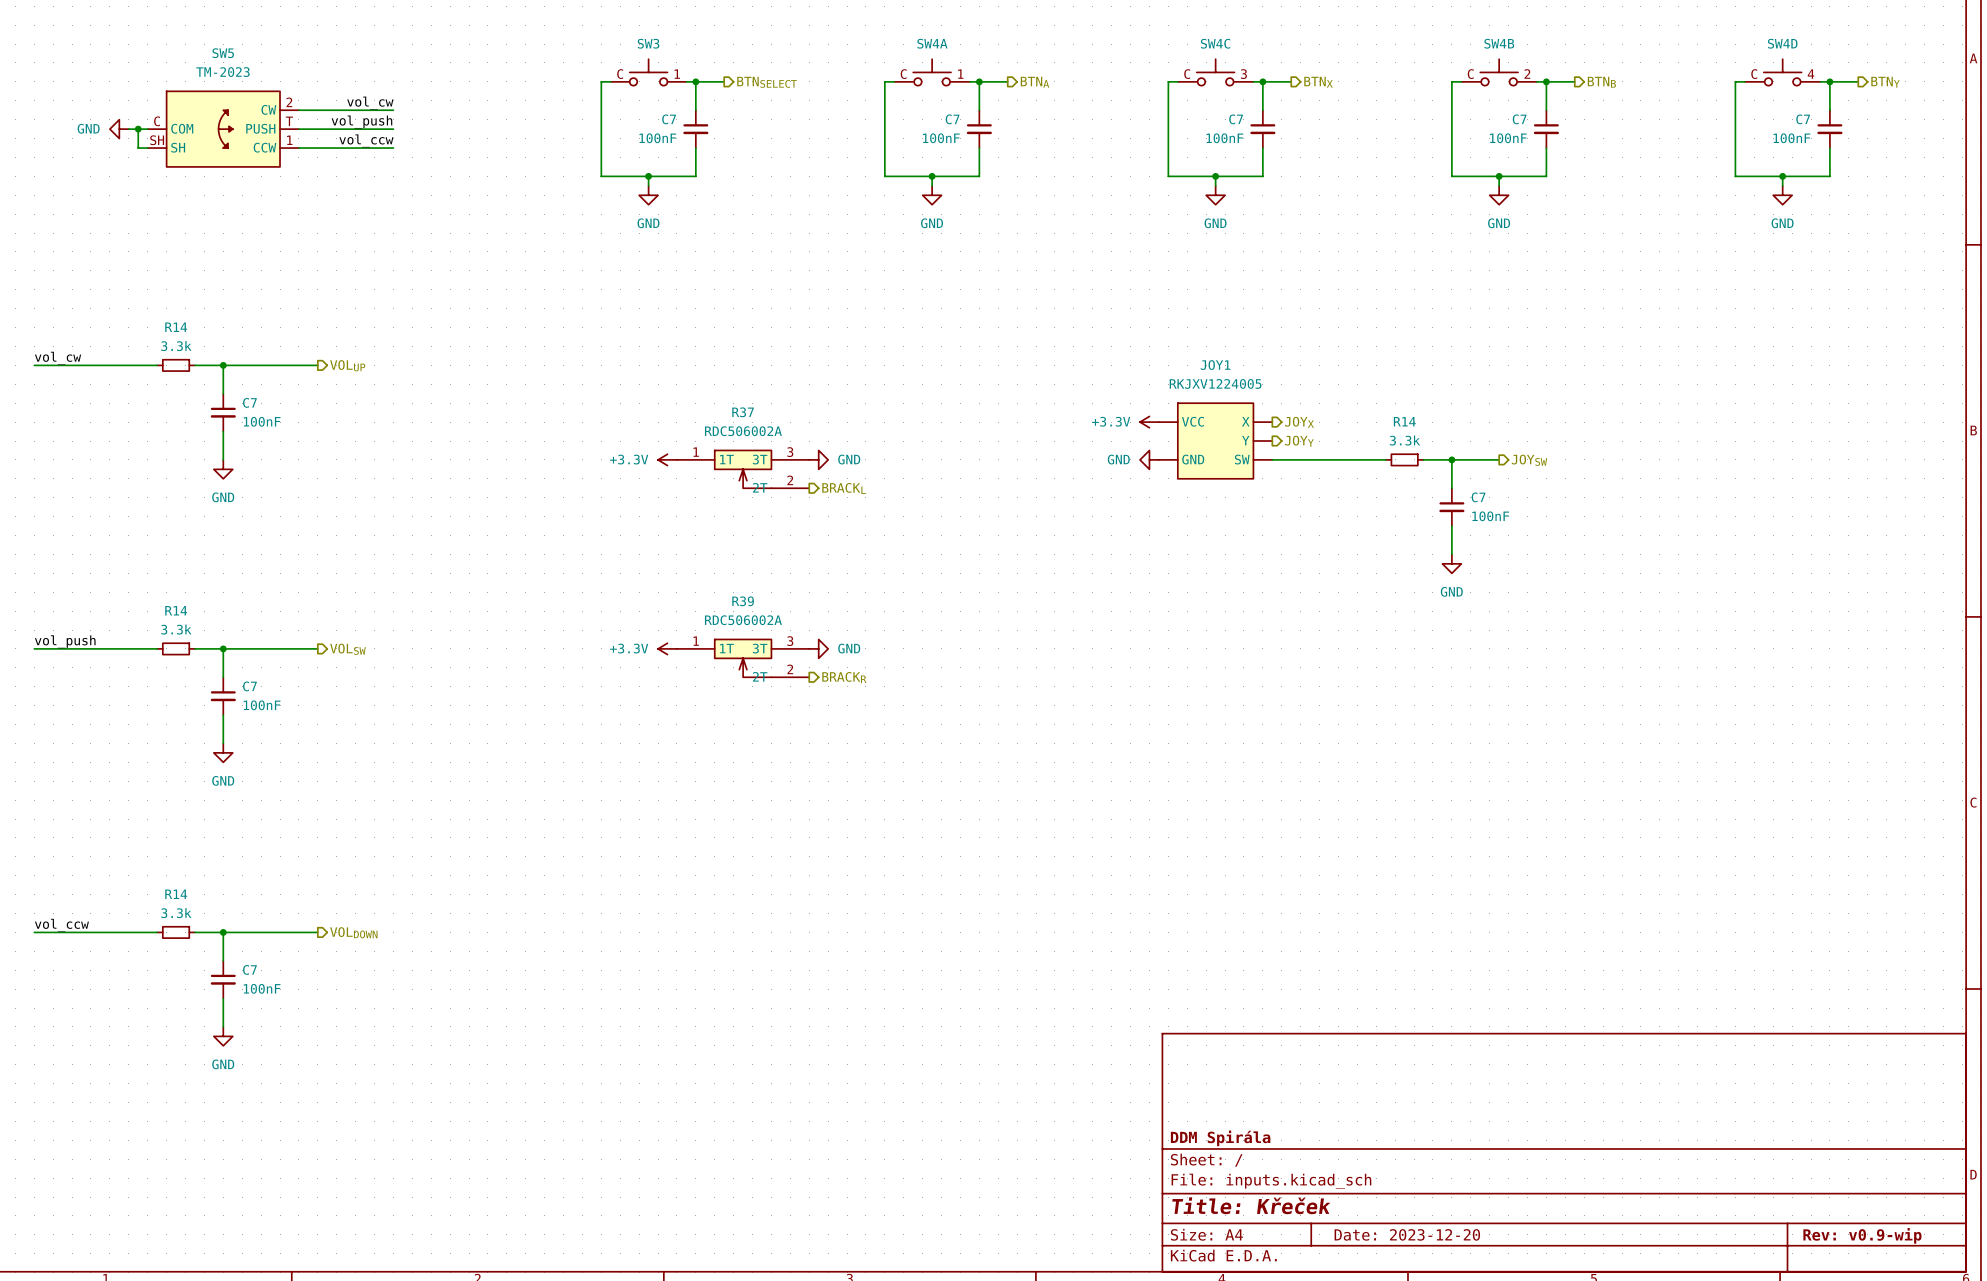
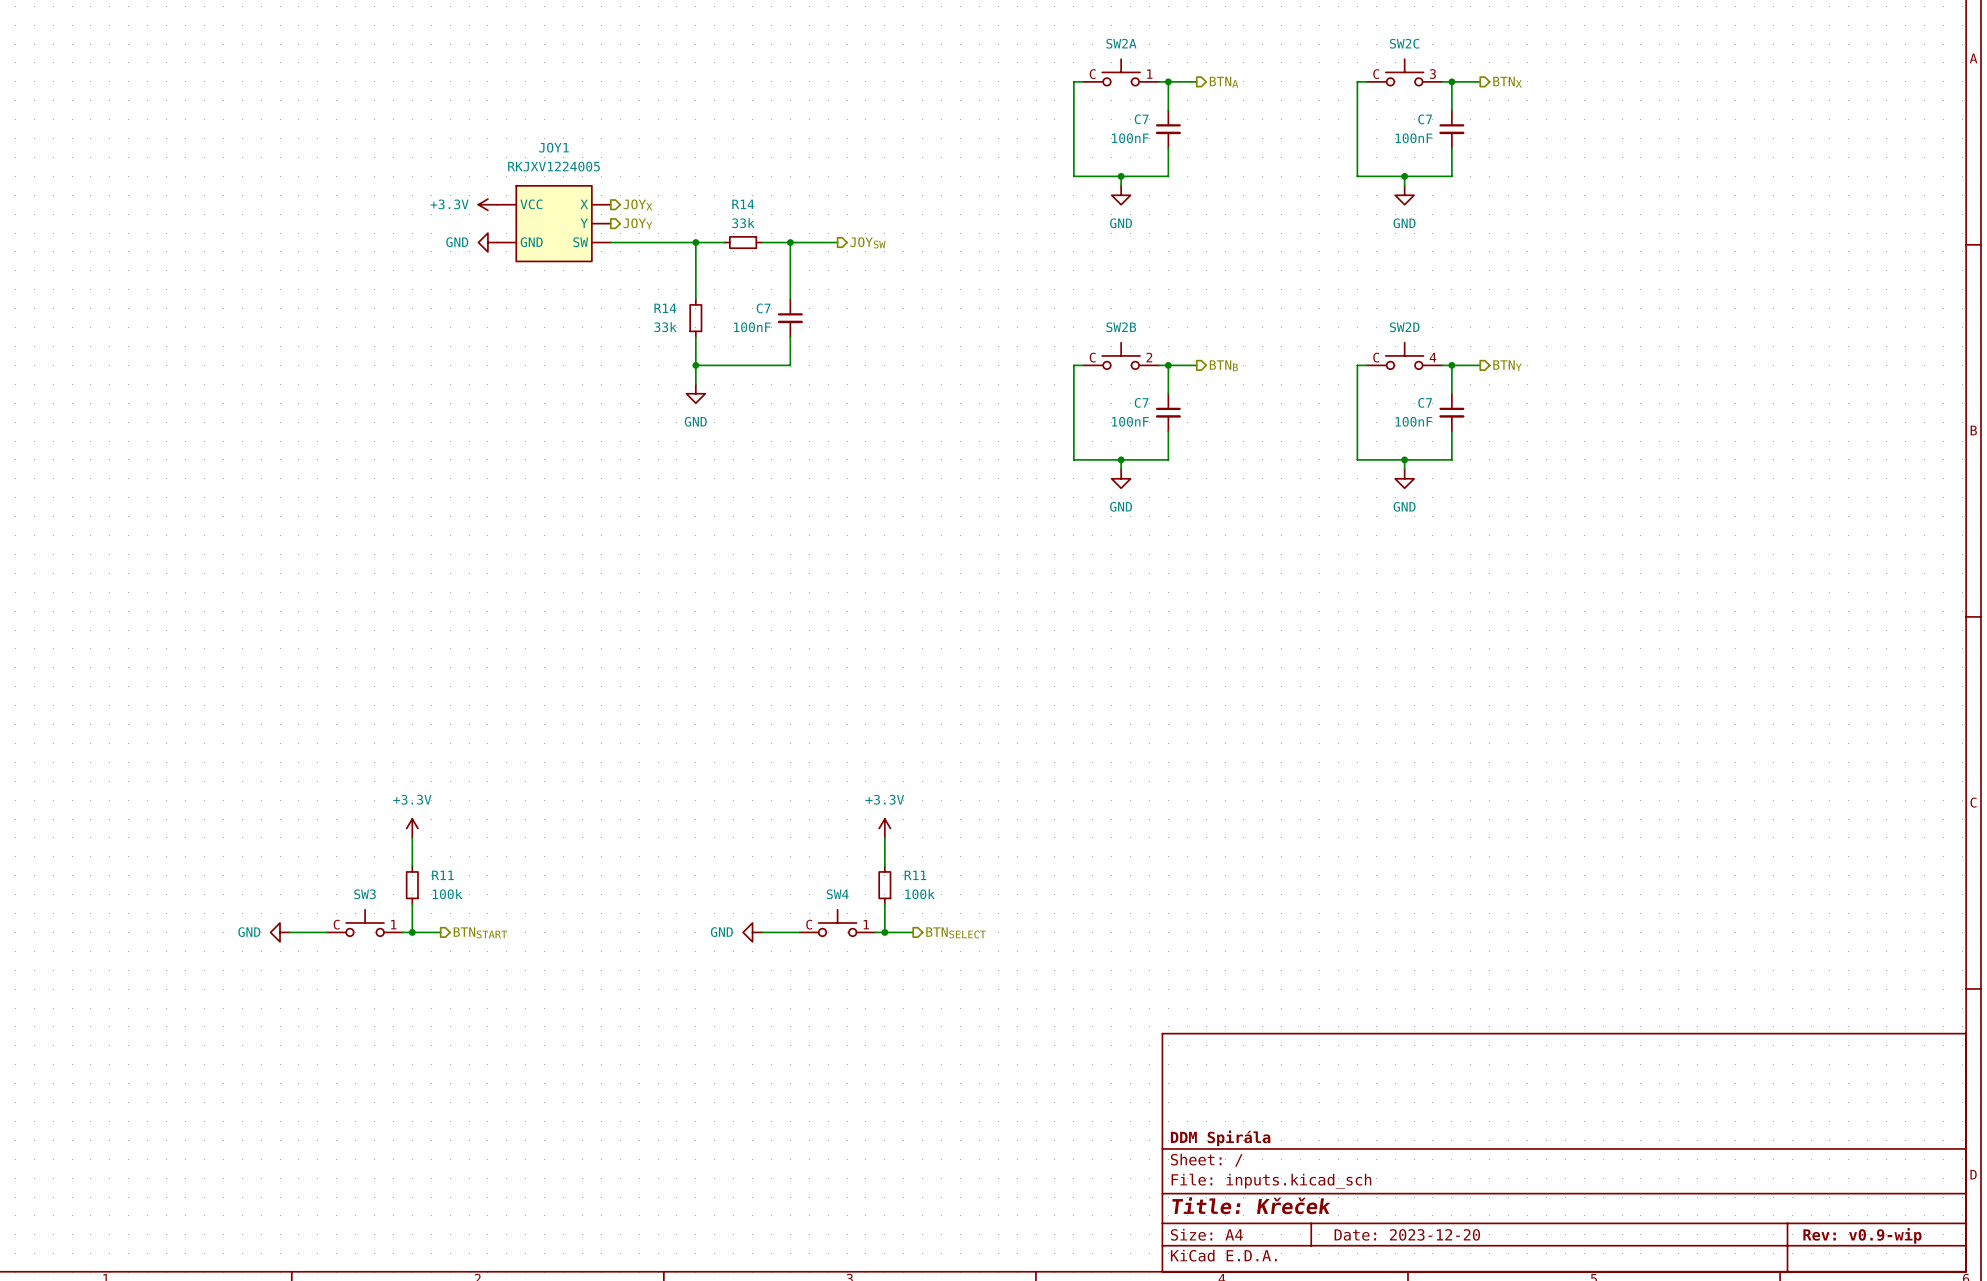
SW3 position: (648, 72) -> (365, 922)
SW4A: (932, 72) -> none
SW2A: none -> (1121, 72)
SW4C: (1215, 72) -> none
SW2C: none -> (1404, 72)
SW4B: (1499, 72) -> none
SW4D: (1782, 72) -> none
wire: (610, 81) (601, 81) (601, 176) (695, 176) (695, 148) -> none
wire: (686, 81) (724, 81) -> none
wire: (695, 81) (695, 110) -> none
junction: (695, 81) -> none
wire: (894, 81) (884, 81) (884, 176) (979, 176) (979, 148) -> none
wire: (969, 81) (1007, 81) -> none
wire: (979, 81) (979, 110) -> none
junction: (979, 81) -> none
wire: none -> (1158, 81) (1168, 81)
junction: none -> (1168, 81)
wire: (1253, 81) (1291, 81) -> none
wire: (1262, 81) (1262, 110) -> none
junction: (1262, 81) -> none
wire: none -> (1442, 81) (1451, 81)
junction: none -> (1451, 81)
wire: (1536, 81) (1574, 81) -> none
wire: (1546, 81) (1546, 110) -> none
junction: (1546, 81) -> none
wire: (1744, 81) (1735, 81) (1735, 176) (1829, 176) (1829, 148) -> none
wire: (1820, 81) (1858, 81) -> none
wire: (1829, 81) (1829, 110) -> none
junction: (1829, 81) -> none
hierarchical label: BTNSELECT (767, 82) -> none
hierarchical label: BTNA (1034, 82) -> none
hierarchical label: none -> BTNA (1223, 82)
hierarchical label: BTNX (1318, 82) -> none
hierarchical label: none -> BTNX (1507, 82)
hierarchical label: BTNB (1601, 82) -> none
hierarchical label: BTNY (1885, 82) -> none
label: vol_cw (370, 103) -> none
wire: (298, 110) (393, 110) -> none
label: vol_push (361, 121) -> none
power symbol: GND (119, 129) -> none
wire: (128, 129) (147, 129) -> none
wire: (138, 129) (138, 148) (147, 148) -> none
junction: (138, 129) -> none
SW5: TM-2023 (223, 129) -> none
wire: (298, 129) (393, 129) -> none
C7: 100nF (695, 129) -> none
C7: 100nF (979, 129) -> none
C7: none -> 100nF (1168, 129)
C7: 100nF (1262, 129) -> none
C7: none -> 100nF (1451, 129)
C7: 100nF (1546, 129) -> none
C7: 100nF (1829, 129) -> none
label: vol_ccw (366, 140) -> none
wire: (298, 148) (393, 148) -> none
wire: (1262, 148) (1262, 176) (1168, 176) -> (1083, 81) (1073, 81) (1073, 176) (1168, 176)
wire: (1546, 148) (1546, 176) (1451, 176) -> (1366, 81) (1357, 81) (1357, 176) (1451, 176)
wire: (648, 176) (648, 185) -> none
junction: (648, 176) -> none
wire: (932, 176) (932, 185) -> none
junction: (932, 176) -> none
junction: none -> (1121, 176)
wire: (1215, 176) (1215, 185) -> (1121, 176) (1121, 185)
junction: (1215, 176) -> none
junction: none -> (1404, 176)
wire: (1499, 176) (1499, 185) -> (1404, 176) (1404, 185)
junction: (1499, 176) -> none
wire: (1782, 176) (1782, 185) -> none
junction: (1782, 176) -> none
power symbol: GND (648, 195) -> none
power symbol: GND (932, 195) -> none
power symbol: none -> GND (1121, 195)
power symbol: GND (1215, 195) -> none
power symbol: none -> GND (1404, 195)
power symbol: GND (1499, 195) -> none
power symbol: GND (1782, 195) -> none
power symbol: none -> +3.3V (487, 204)
hierarchical label: none -> JOYX (637, 205)
hierarchical label: none -> JOYY (637, 223)
power symbol: none -> GND (487, 242)
wire: none -> (610, 242) (724, 242)
wire: none -> (695, 242) (695, 299)
junction: none -> (695, 242)
R14: none -> 33k (743, 242)
wire: none -> (761, 242) (837, 242)
wire: none -> (790, 242) (790, 299)
junction: none -> (790, 242)
hierarchical label: none -> JOYSW (867, 242)
R14: none -> 33k (695, 318)
C7: none -> 100nF (790, 318)
wire: none -> (695, 337) (695, 384)
wire: none -> (790, 337) (790, 365) (695, 365)
SW2B: none -> (1121, 355)
SW2D: none -> (1404, 355)
label: vol_cw (58, 358) -> none
wire: (34, 365) (157, 365) -> none
R14: 3.3k (176, 365) -> none
wire: (194, 365) (317, 365) -> none
wire: (223, 365) (223, 393) -> none
junction: (223, 365) -> none
hierarchical label: VOLUP (347, 365) -> none
junction: none -> (695, 365)
wire: none -> (1083, 365) (1073, 365) (1073, 459) (1168, 459) (1168, 431)
wire: none -> (1158, 365) (1196, 365)
wire: none -> (1168, 365) (1168, 393)
junction: none -> (1168, 365)
hierarchical label: none -> BTNB (1223, 365)
wire: none -> (1442, 365) (1480, 365)
wire: none -> (1451, 365) (1451, 393)
junction: none -> (1451, 365)
hierarchical label: none -> BTNY (1507, 365)
power symbol: none -> GND (695, 393)
C7: 100nF (223, 412) -> none
C7: none -> 100nF (1168, 412)
power symbol: +3.3V (1149, 422) -> none
hierarchical label: JOYX (1299, 422) -> none
wire: (223, 431) (223, 459) -> none
JOY1 position: (1215, 441) -> (554, 223)
hierarchical label: JOYY (1299, 441) -> none
power symbol: +3.3V (667, 459) -> none
power symbol: GND (818, 459) -> none
wire: none -> (1121, 459) (1121, 469)
junction: none -> (1121, 459)
power symbol rotation: 0° (1149, 459) -> 90° counterclockwise (1121, 478)
power symbol position: GND (1149, 459) -> GND (1121, 478)
wire: (1272, 459) (1357, 459) -> (1366, 365) (1357, 365) (1357, 459)
wire: none -> (1385, 459) (1423, 459)
wire: none -> (1404, 459) (1404, 469)
junction: none -> (1404, 459)
R14: 3.3k (1404, 459) -> none
junction: (1451, 459) -> none
wire: (1499, 459) (1451, 459) (1451, 488) -> none
hierarchical label: JOYSW (1529, 460) -> none
power symbol: GND (223, 469) -> none
R37: RDC506002A (743, 469) -> none
hierarchical label: BRACKL (844, 488) -> none
C7 name position: C7 (1478, 497) -> C7 (1425, 402)
C7 position: (1451, 507) -> (1451, 412)
C7 value position: 100nF (1490, 516) -> 100nF (1413, 421)
wire: (1451, 526) (1451, 554) -> (1451, 431) (1451, 459)
power symbol position: GND (1451, 563) -> GND (1404, 478)
label: vol_push (65, 641) -> none
wire: (34, 648) (157, 648) -> none
R14: 3.3k (176, 648) -> none
wire: (194, 648) (317, 648) -> none
wire: (223, 648) (223, 677) -> none
junction: (223, 648) -> none
power symbol: +3.3V (667, 648) -> none
power symbol: GND (818, 648) -> none
hierarchical label: VOLSW (347, 649) -> none
R39: RDC506002A (743, 658) -> none
hierarchical label: BRACKR (844, 677) -> none
C7: 100nF (223, 696) -> none
wire: (223, 715) (223, 743) -> none
power symbol: GND (223, 752) -> none
power symbol: none -> +3.3V (412, 828)
power symbol: none -> +3.3V (884, 828)
wire: none -> (412, 837) (412, 866)
wire: none -> (884, 837) (884, 866)
R11: none -> 100k (412, 885)
R11: none -> 100k (884, 885)
wire: none -> (412, 904) (412, 932)
wire: none -> (884, 904) (884, 932)
SW4: none -> (837, 922)
label: vol_ccw (61, 925) -> none
wire: (34, 932) (157, 932) -> none
R14: 3.3k (176, 932) -> none
wire: (194, 932) (289, 932) -> none
wire: (223, 932) (223, 960) -> none
junction: (223, 932) -> none
power symbol: none -> GND (280, 932)
wire: none -> (317, 932) (327, 932)
hierarchical label: VOLDOWN (353, 932) -> none
wire: none -> (402, 932) (440, 932)
junction: none -> (412, 932)
hierarchical label: none -> BTNSTART (480, 932)
power symbol: none -> GND (752, 932)
wire: none -> (761, 932) (799, 932)
wire: none -> (875, 932) (913, 932)
junction: none -> (884, 932)
hierarchical label: none -> BTNSELECT (956, 932)
C7: 100nF (223, 979) -> none
wire: (223, 998) (223, 1026) -> none
power symbol: GND (223, 1036) -> none

